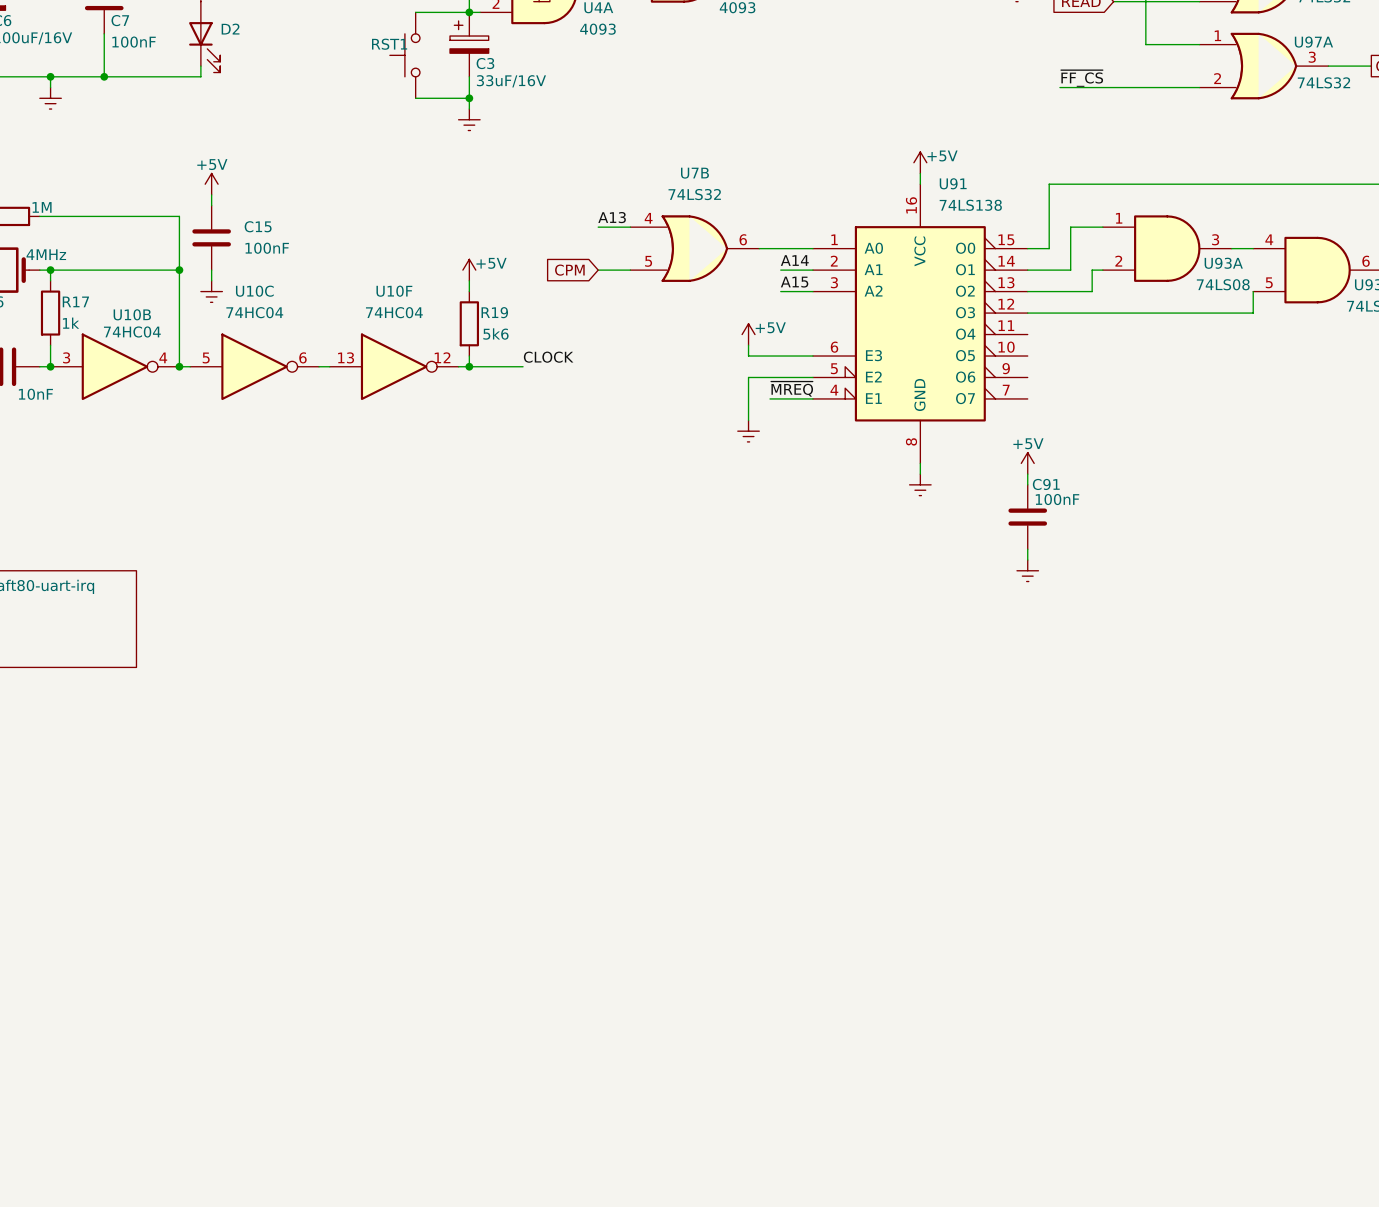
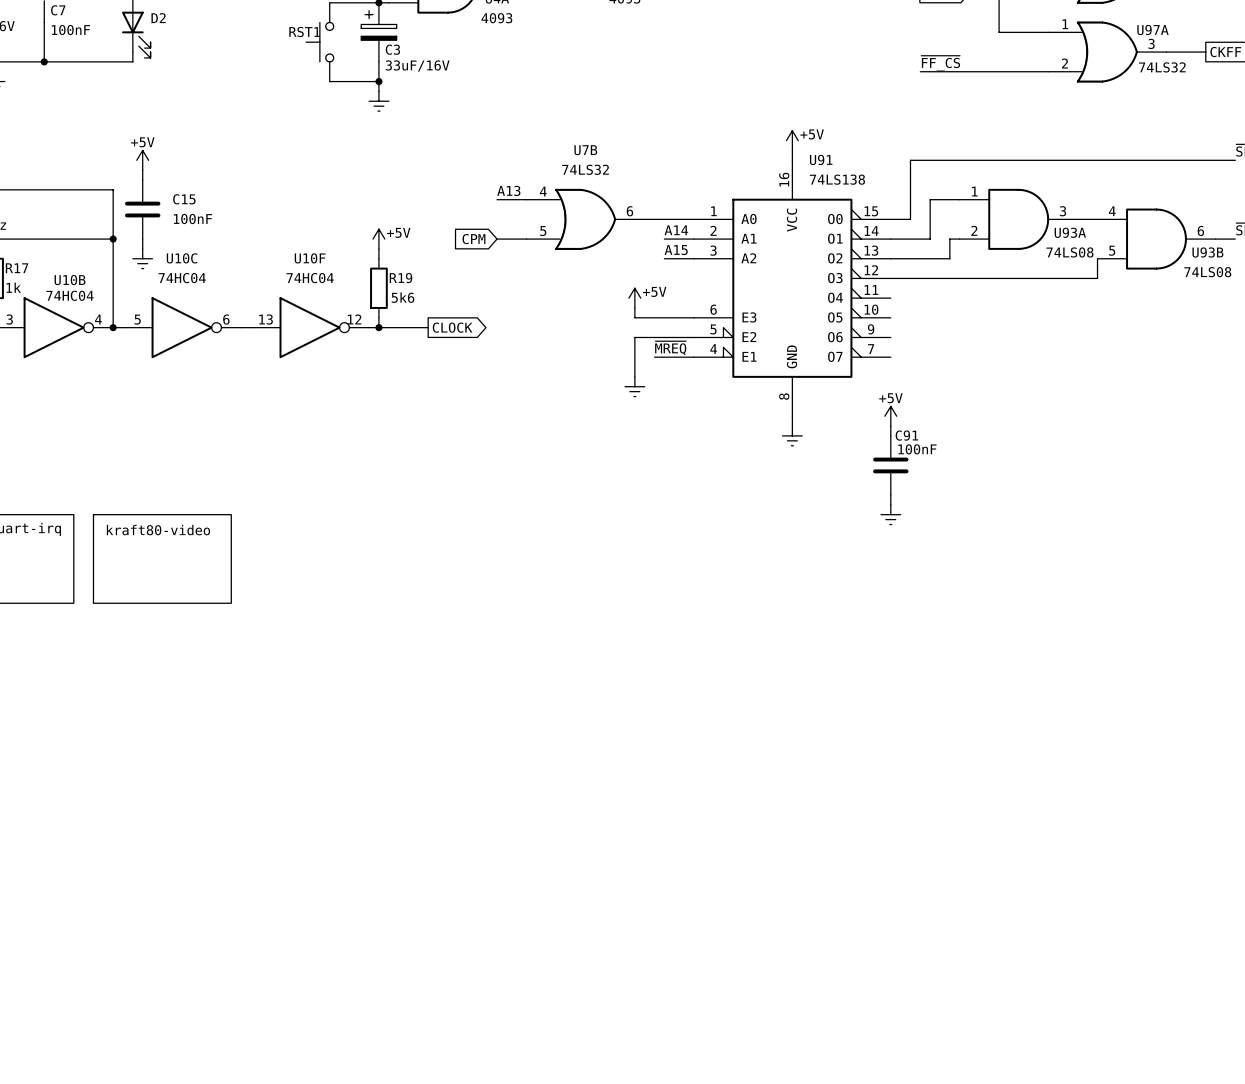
label: CLOCK (548, 357) -> none
global label: none -> CLOCK (452, 327)
sheet kraft80-video: none -> (162, 558)

